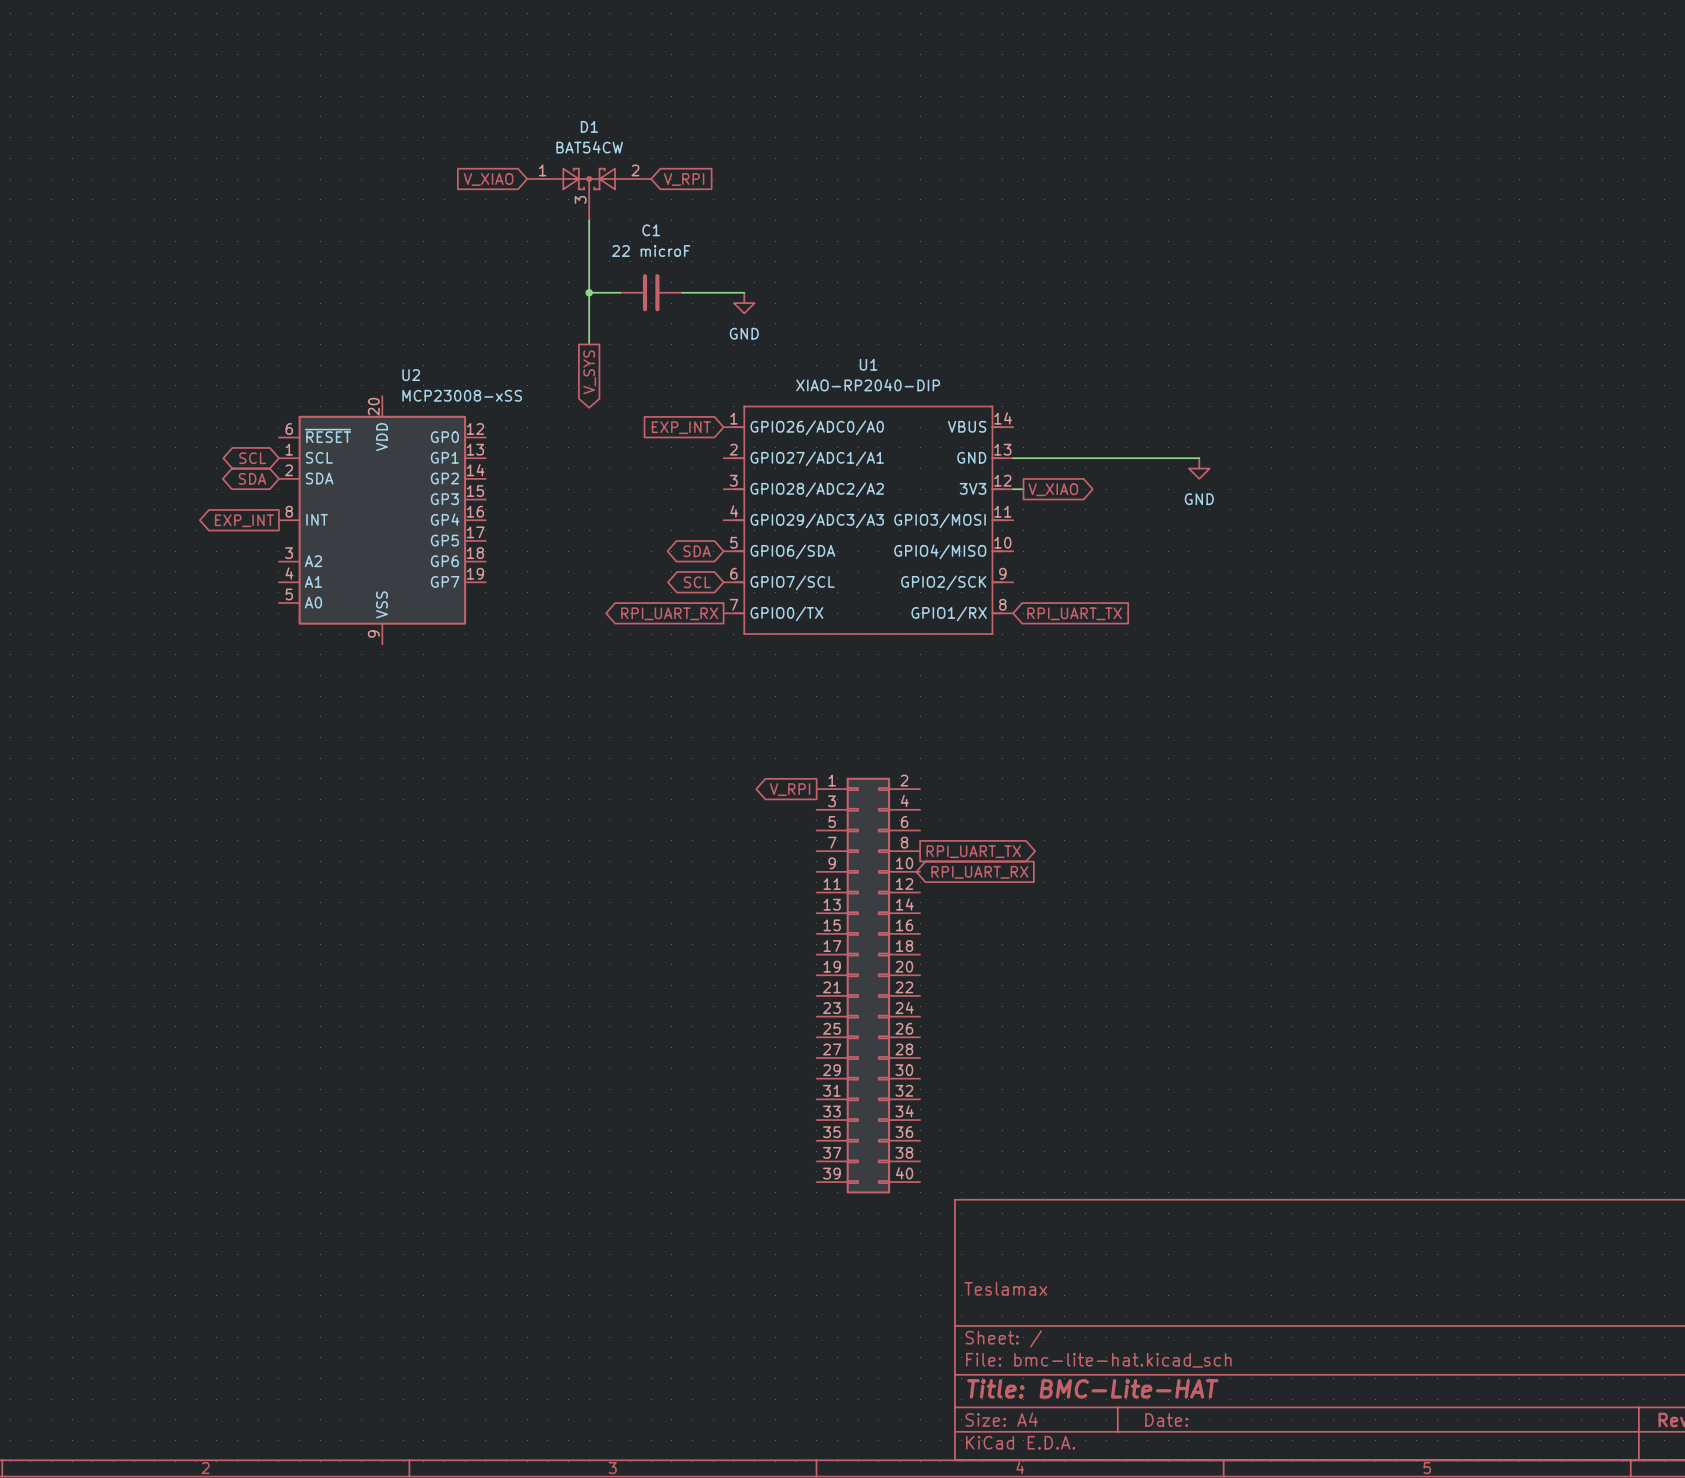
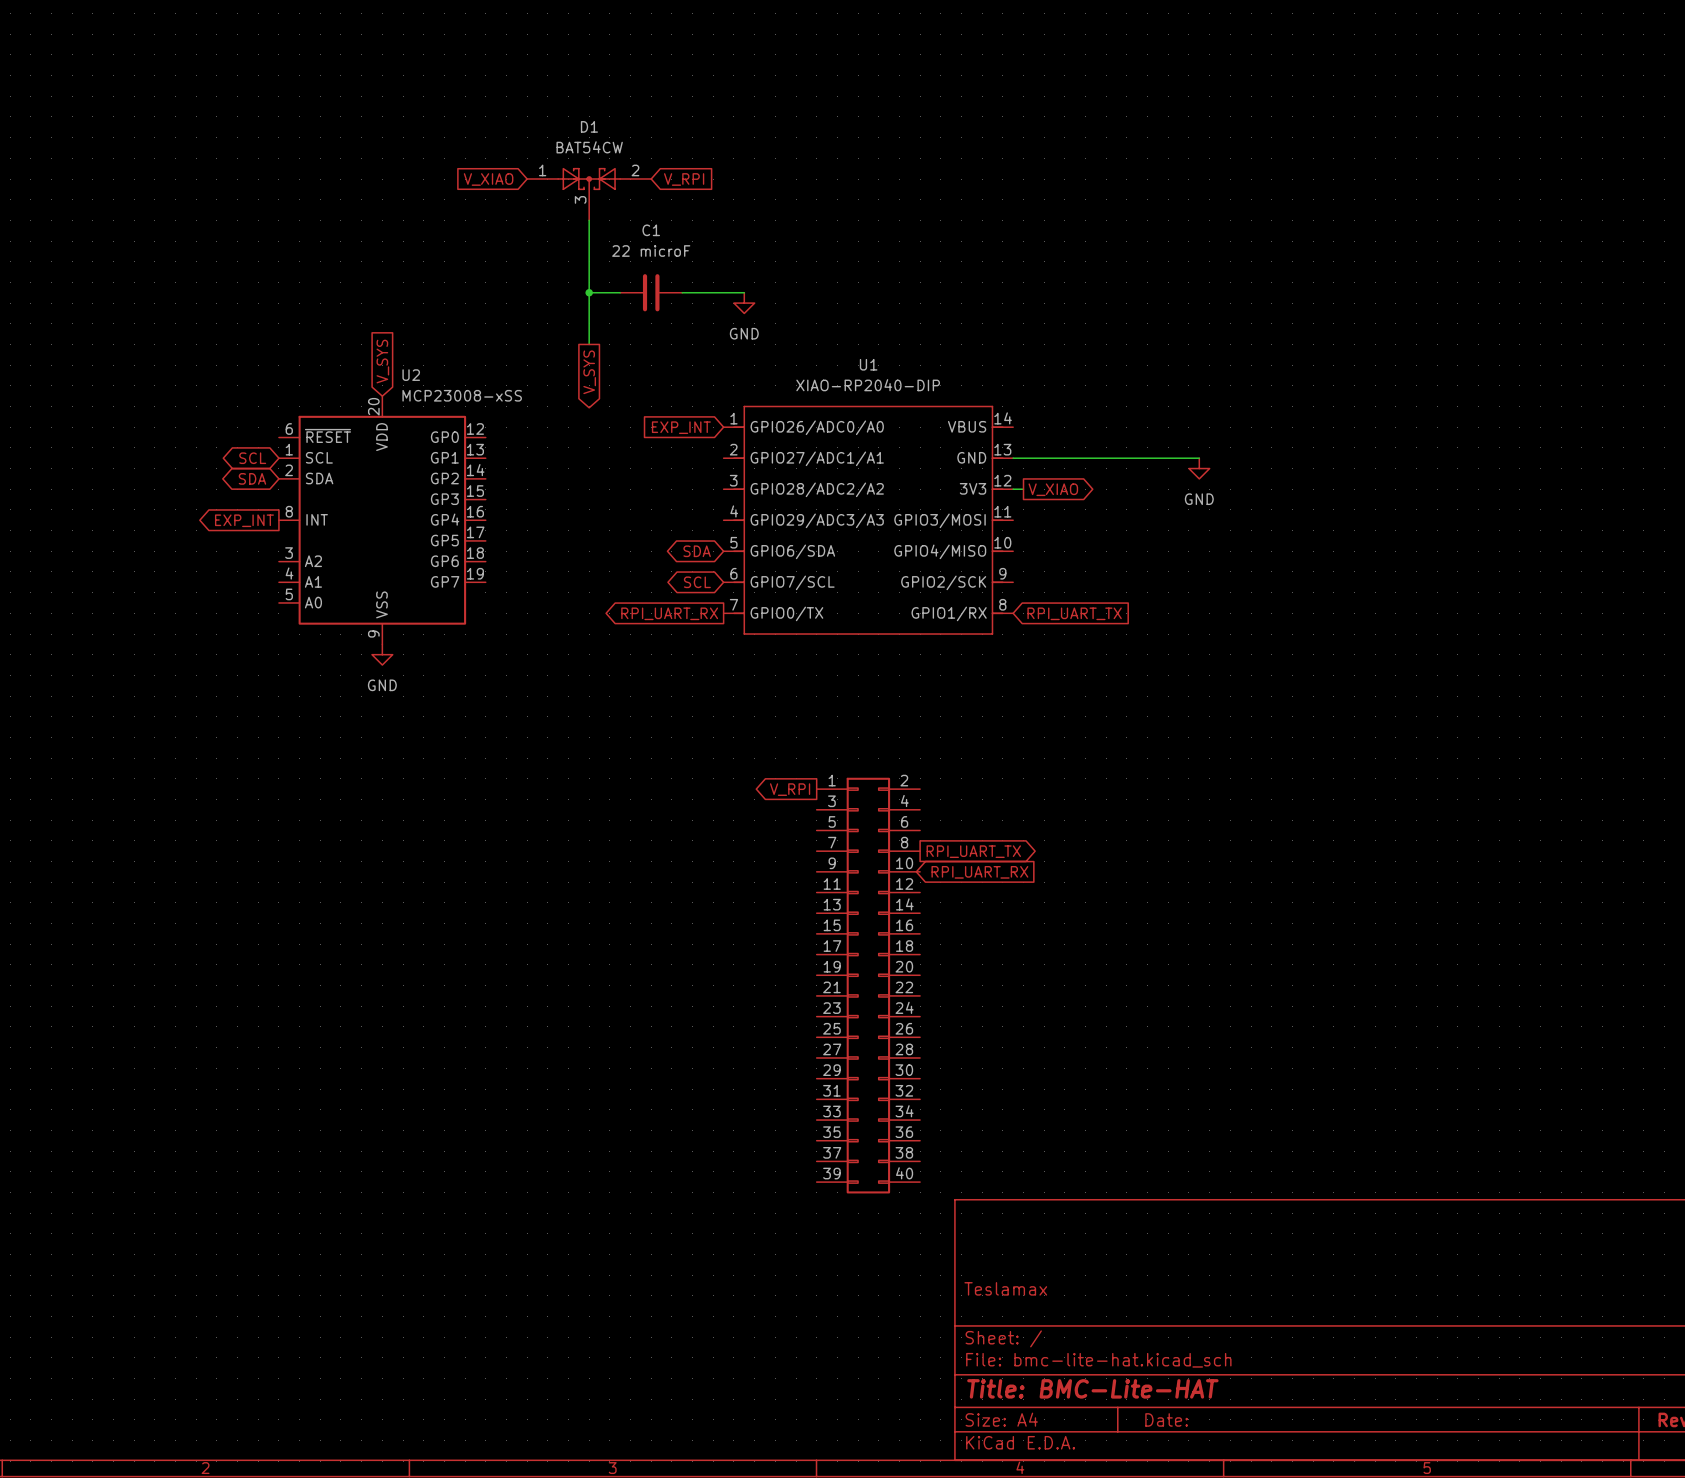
global label: none -> V_SYS (382, 361)
power symbol: none -> GND (382, 654)

